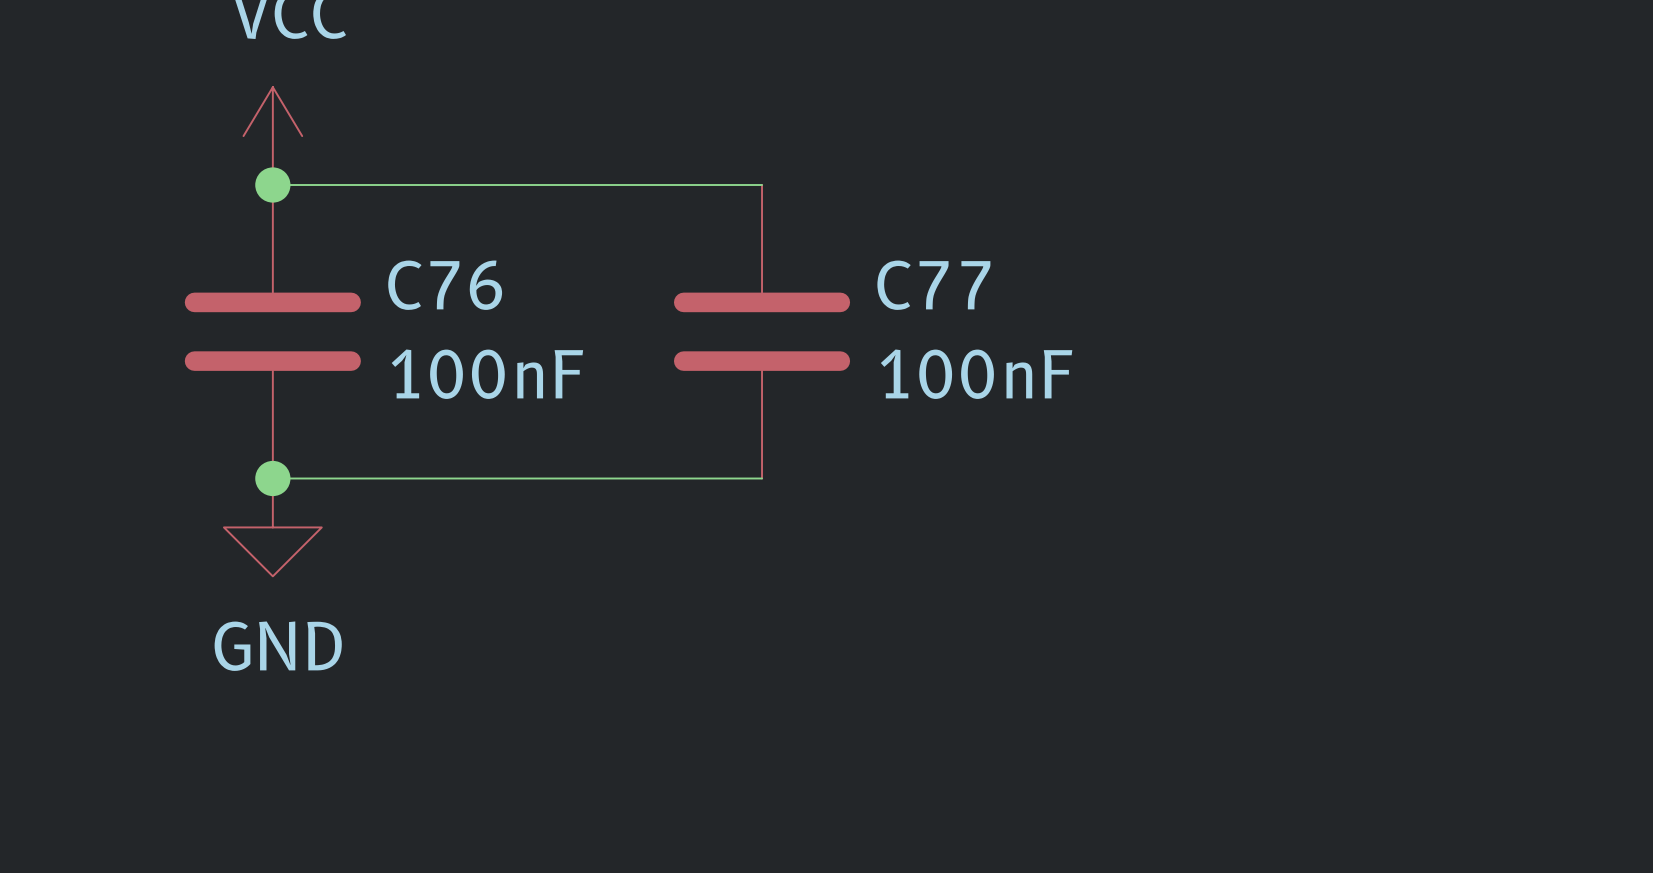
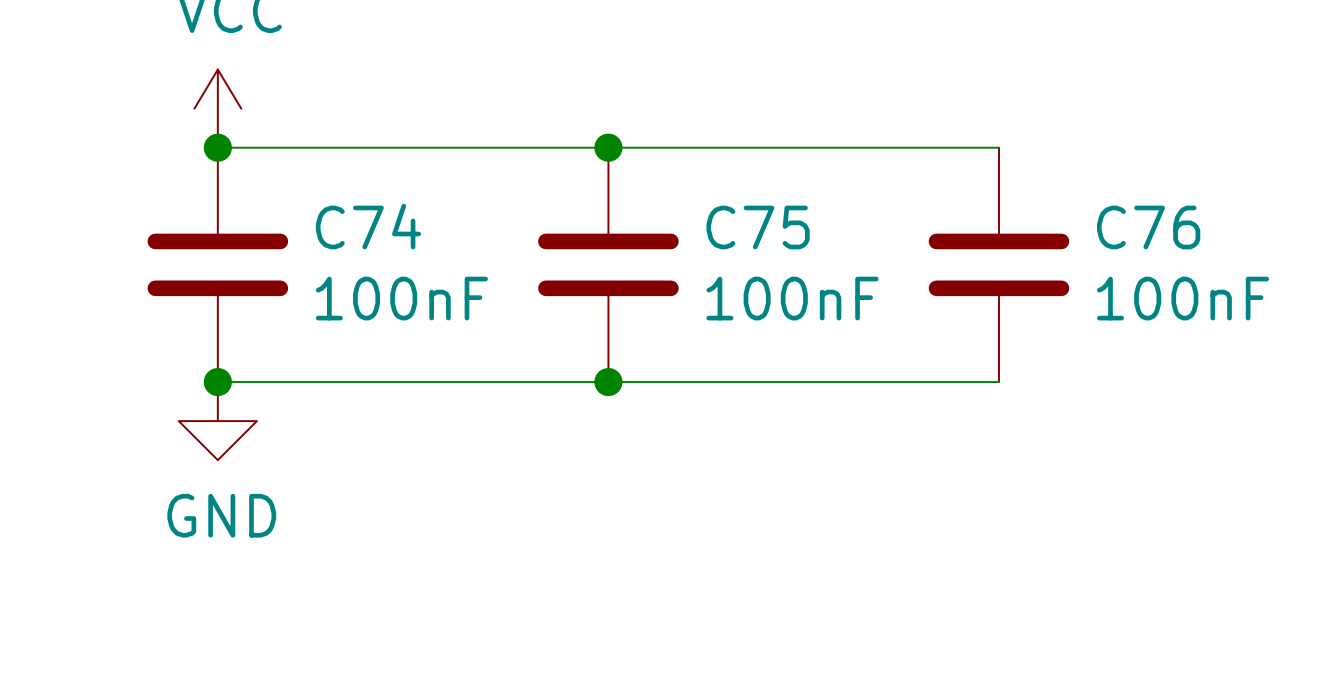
wire: none -> (608, 147) (998, 147)
junction: none -> (608, 147)
C76 name: C76 (445, 285) -> C74 (368, 226)
C77 name: C77 (933, 285) -> C75 (758, 227)
C76: none -> 100nF (998, 264)
wire: none -> (608, 382) (998, 382)
junction: none -> (608, 382)

